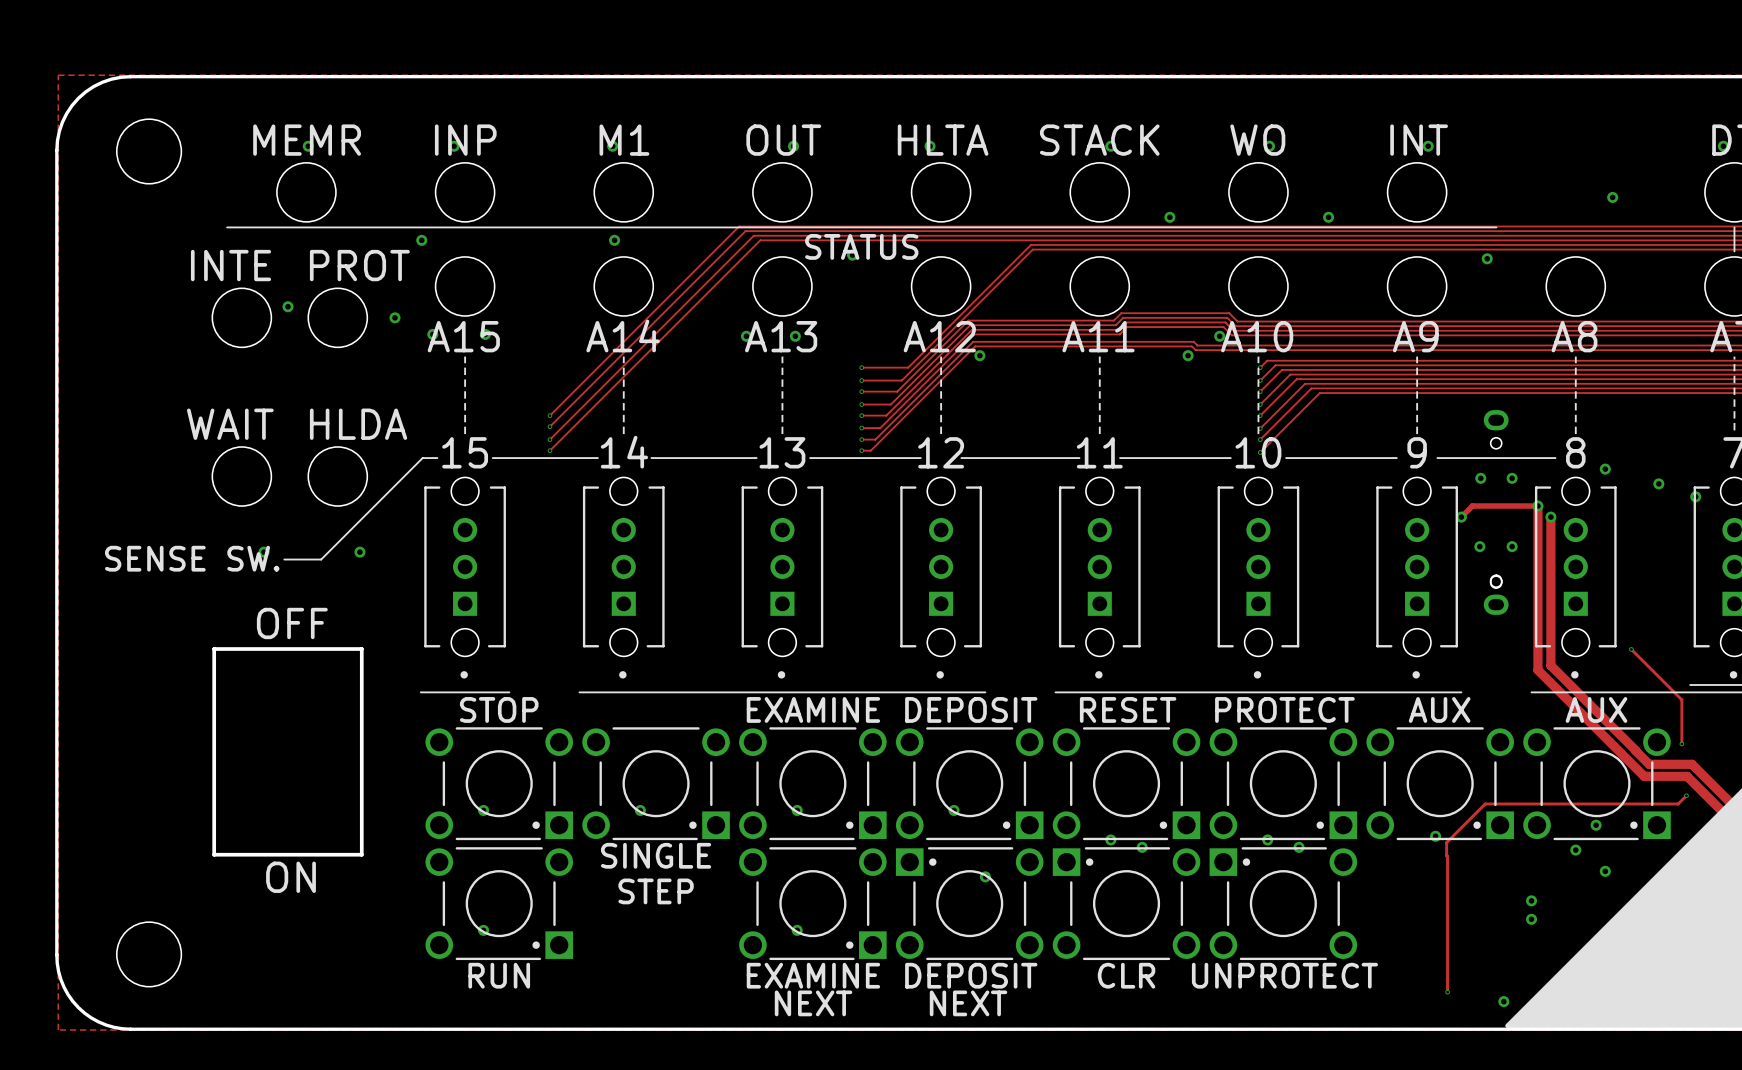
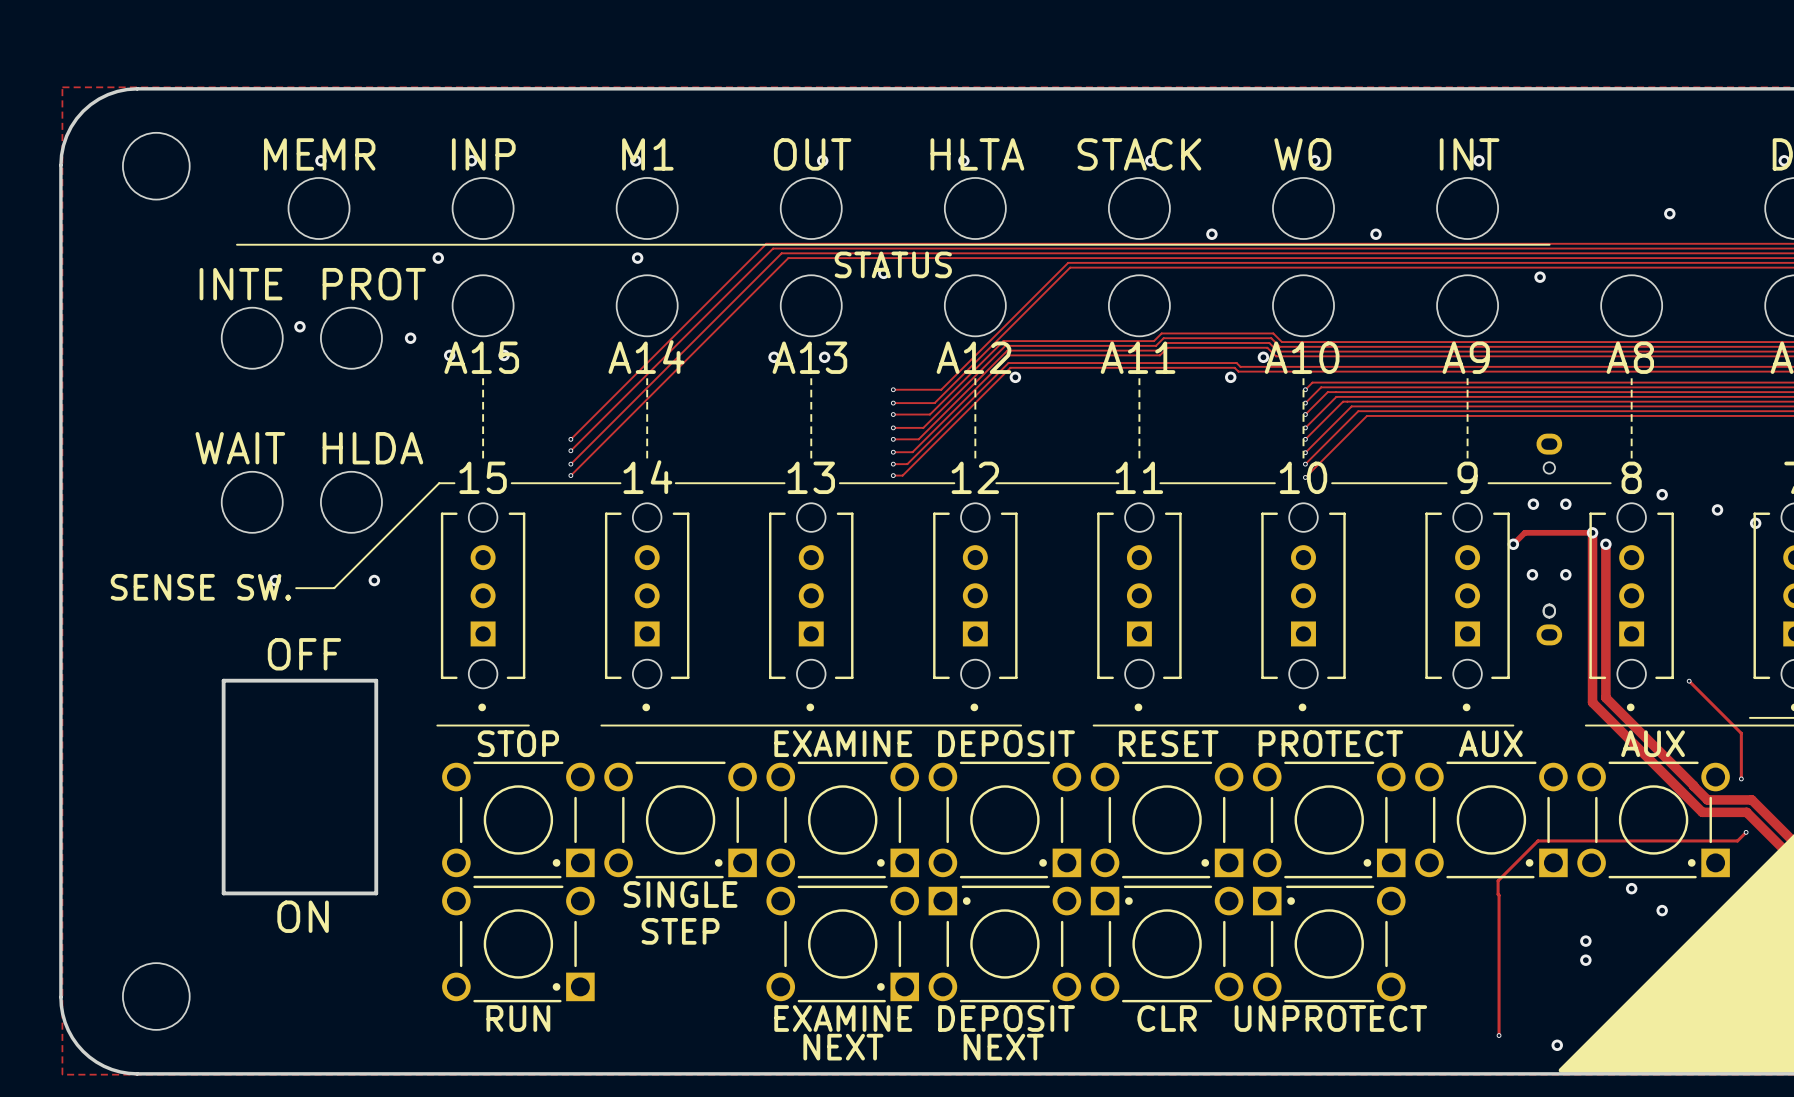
via: (483, 810) -> none
via: (640, 810) -> none
via: (797, 810) -> none
via: (954, 810) -> none
via: (1596, 825) -> none
via: (1435, 836) -> none
via: (1110, 839) -> none
via: (1267, 839) -> none
via: (1142, 847) -> none
via: (1299, 847) -> none
via: (985, 876) -> none
via: (483, 930) -> none
via: (797, 930) -> none

